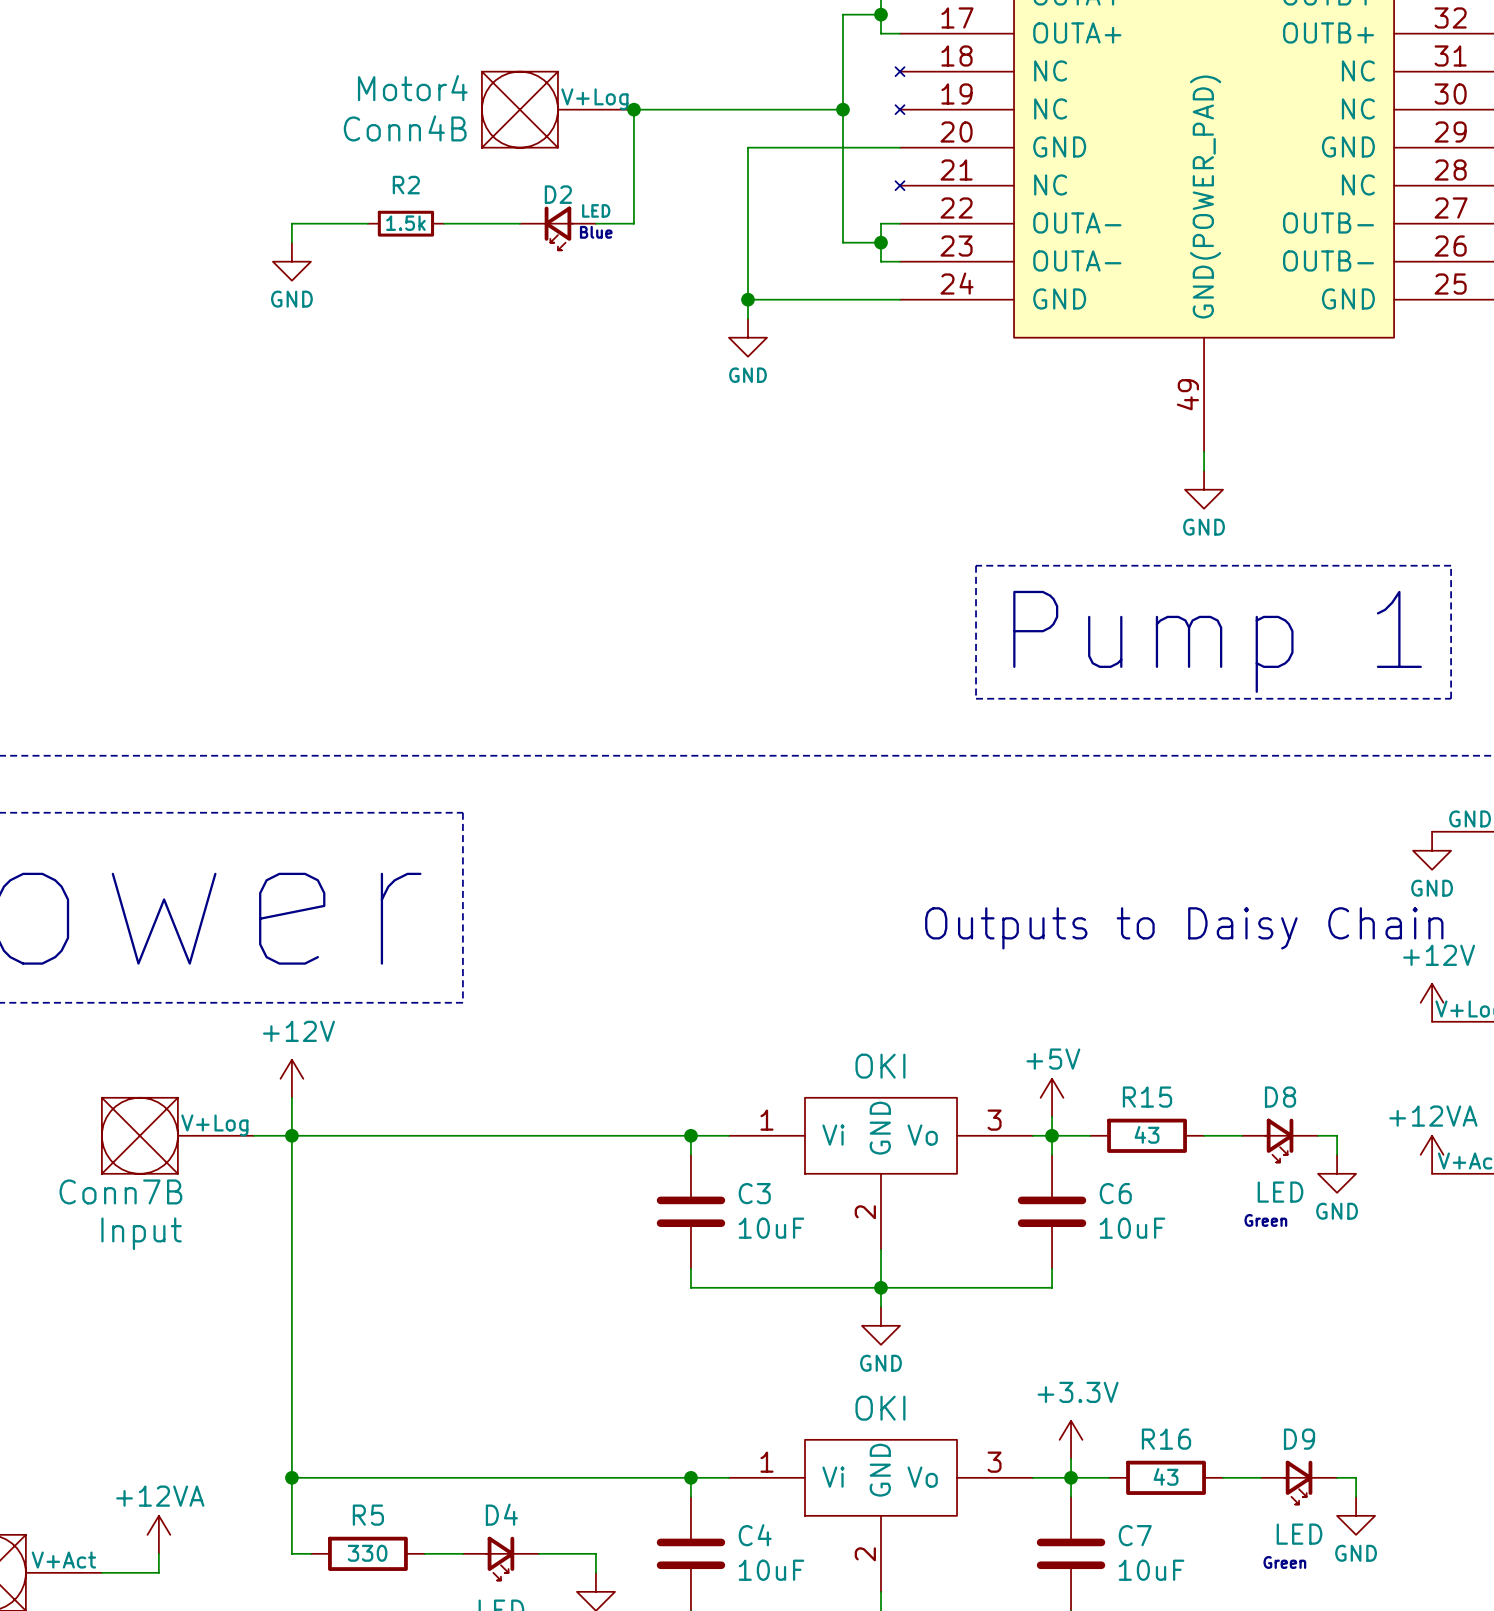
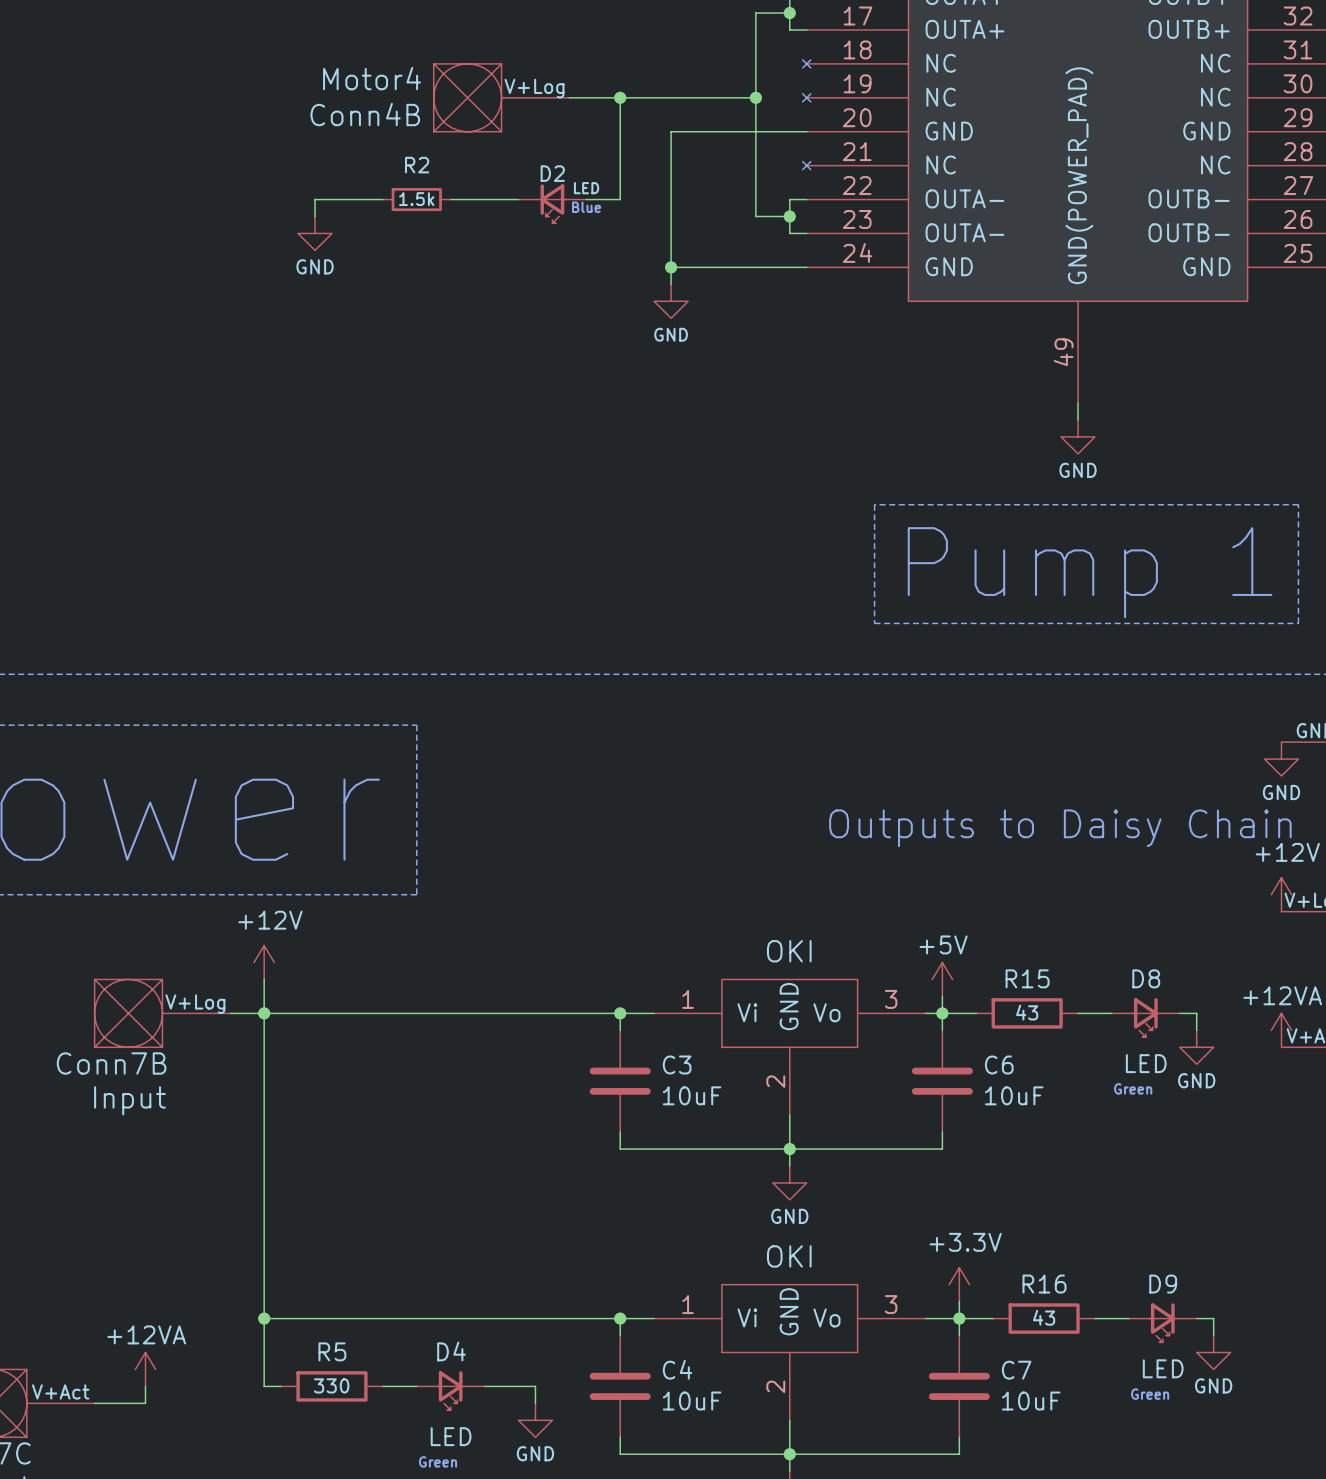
wire: (633, 109) (633, 223) (595, 223) -> (620, 97) (620, 199) (586, 199)
junction position: (633, 109) -> (620, 97)
wire: (348, 223) (291, 223) (291, 242) -> (315, 199) (315, 216)
R2 position: (405, 223) -> (416, 199)
wire: (443, 223) (500, 223) -> (331, 199) (382, 199)
D2 position: (557, 228) -> (552, 203)
text position: Blue (596, 232) -> Blue (586, 207)
power symbol position: GND (291, 261) -> GND (315, 233)

